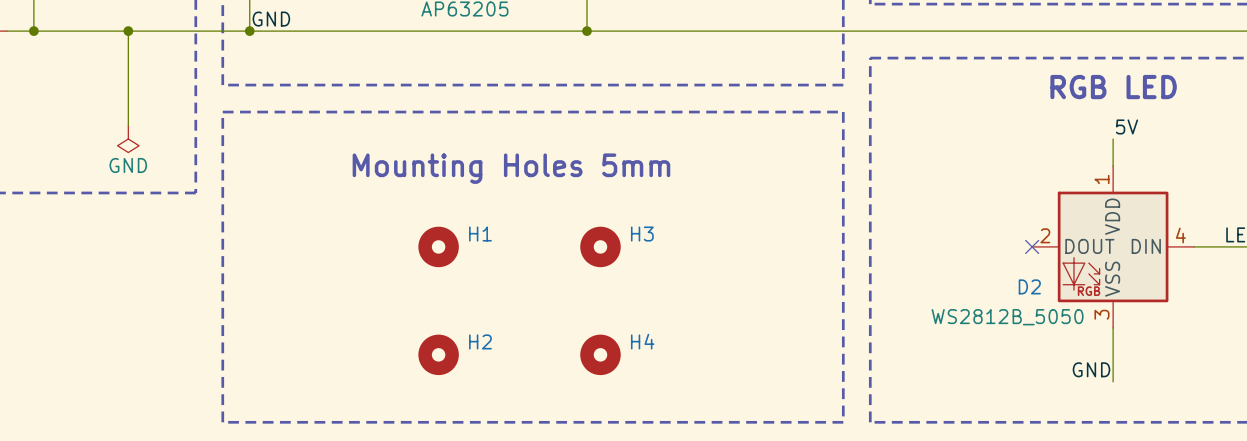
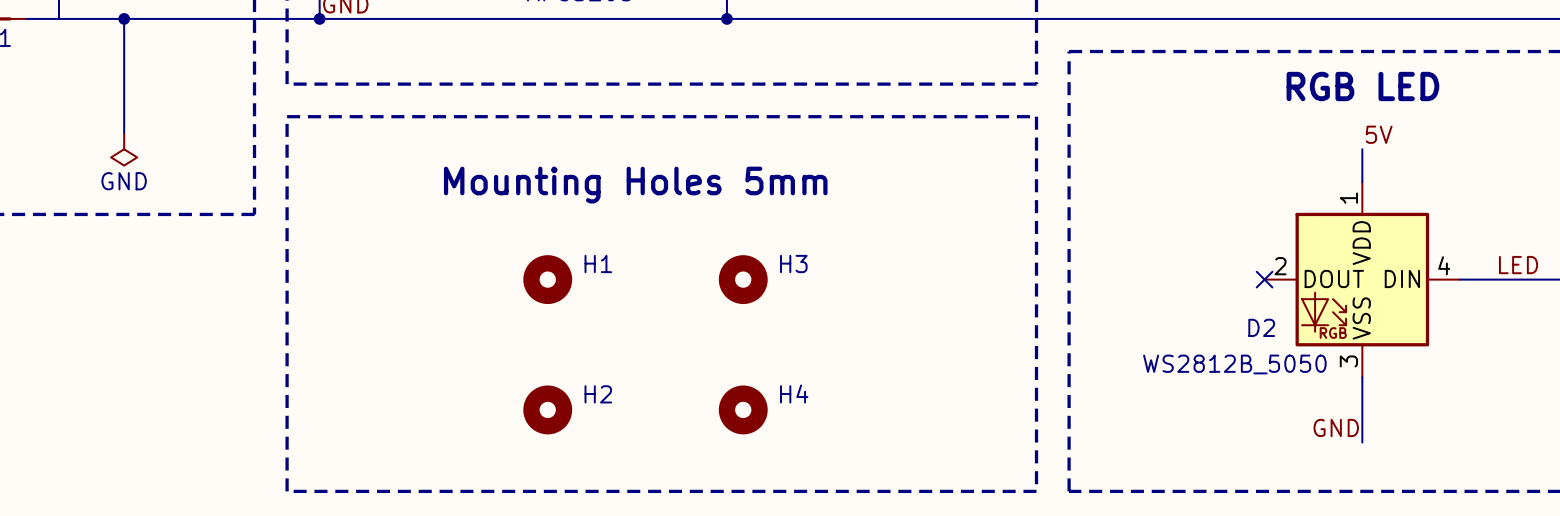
junction: (33, 31) -> none
junction: none -> (124, 18)
wire: (128, 31) (128, 125) -> (124, 18) (124, 132)
junction: (128, 31) -> none
power symbol position: GND (128, 139) -> GND (124, 149)

